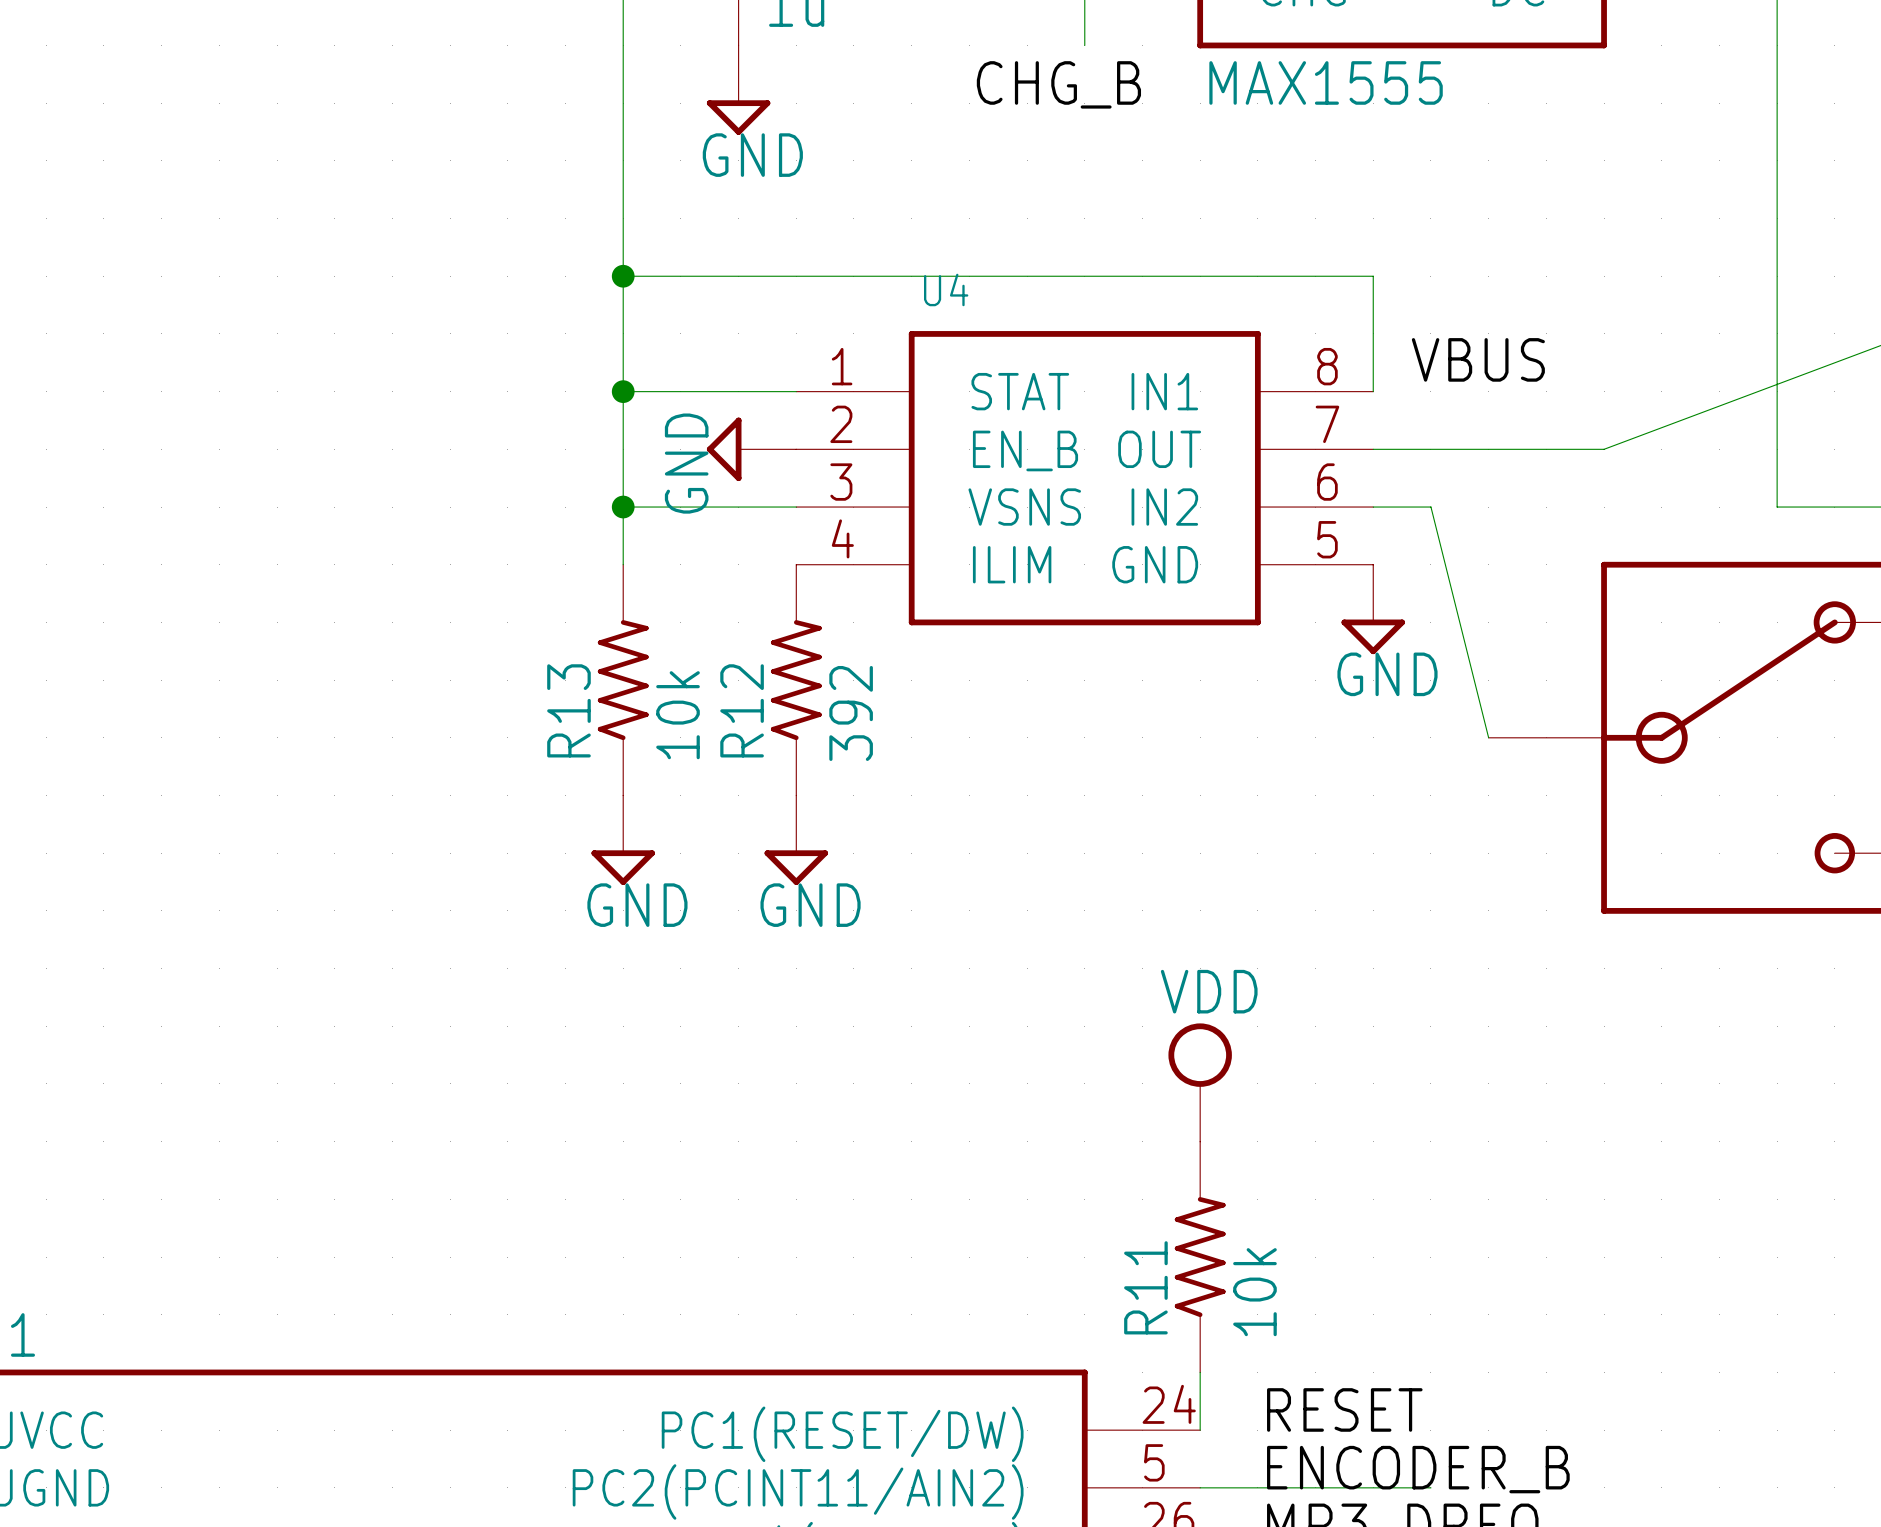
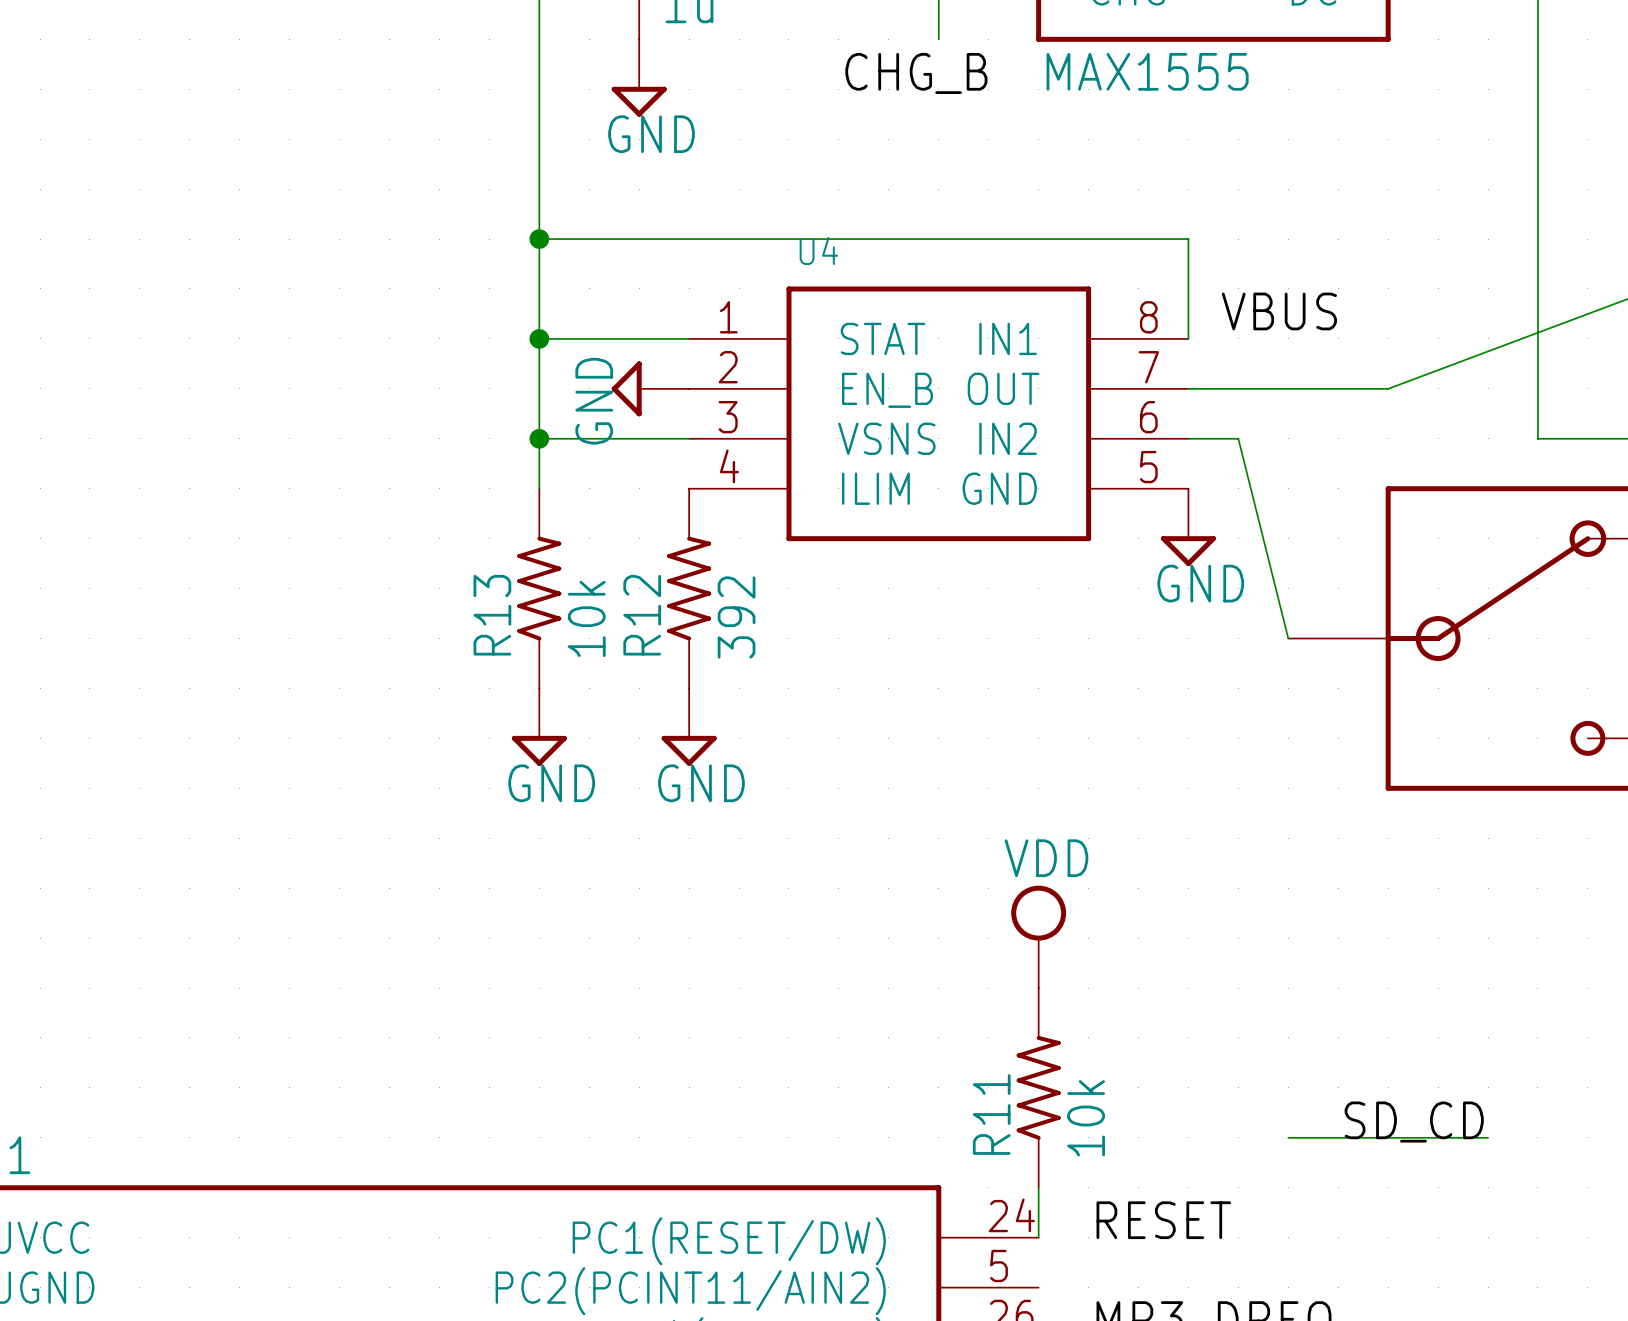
label: none -> SD_CD (1414, 1122)
label: ENCODER_B (1418, 1469) -> none
wire: (1200, 1487) (1430, 1487) -> (1288, 1137) (1488, 1137)

